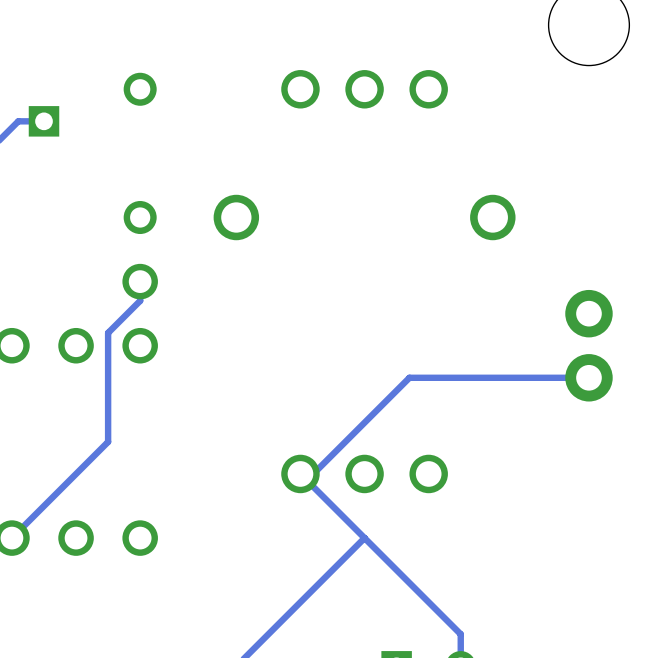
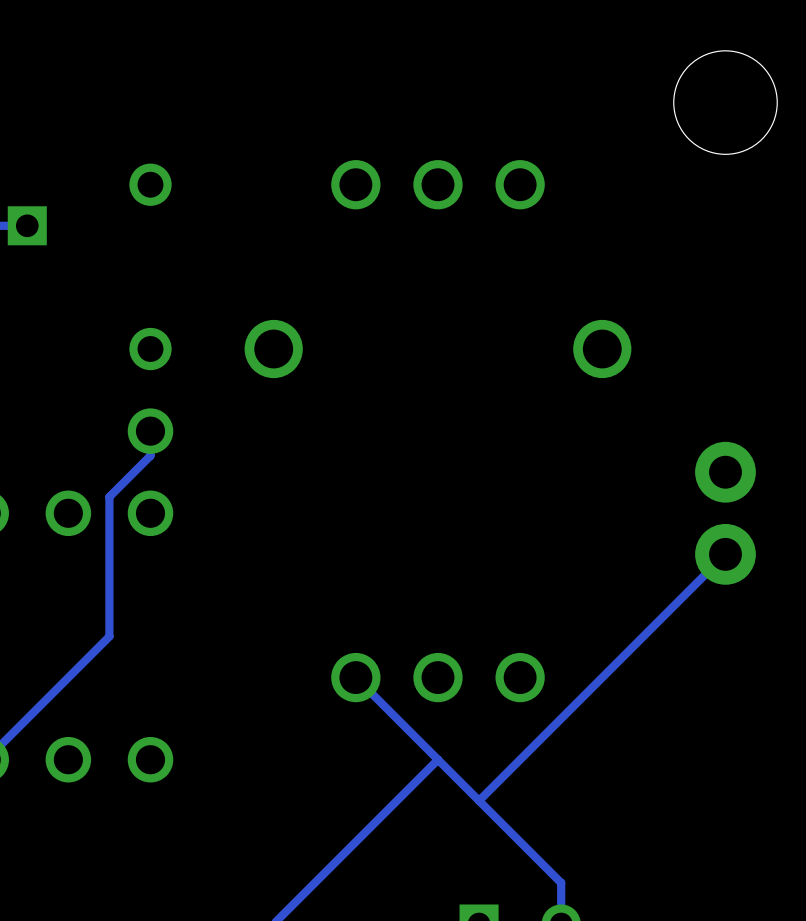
track: (588, 377) (409, 377) (306, 480) -> (725, 554) (479, 800)

